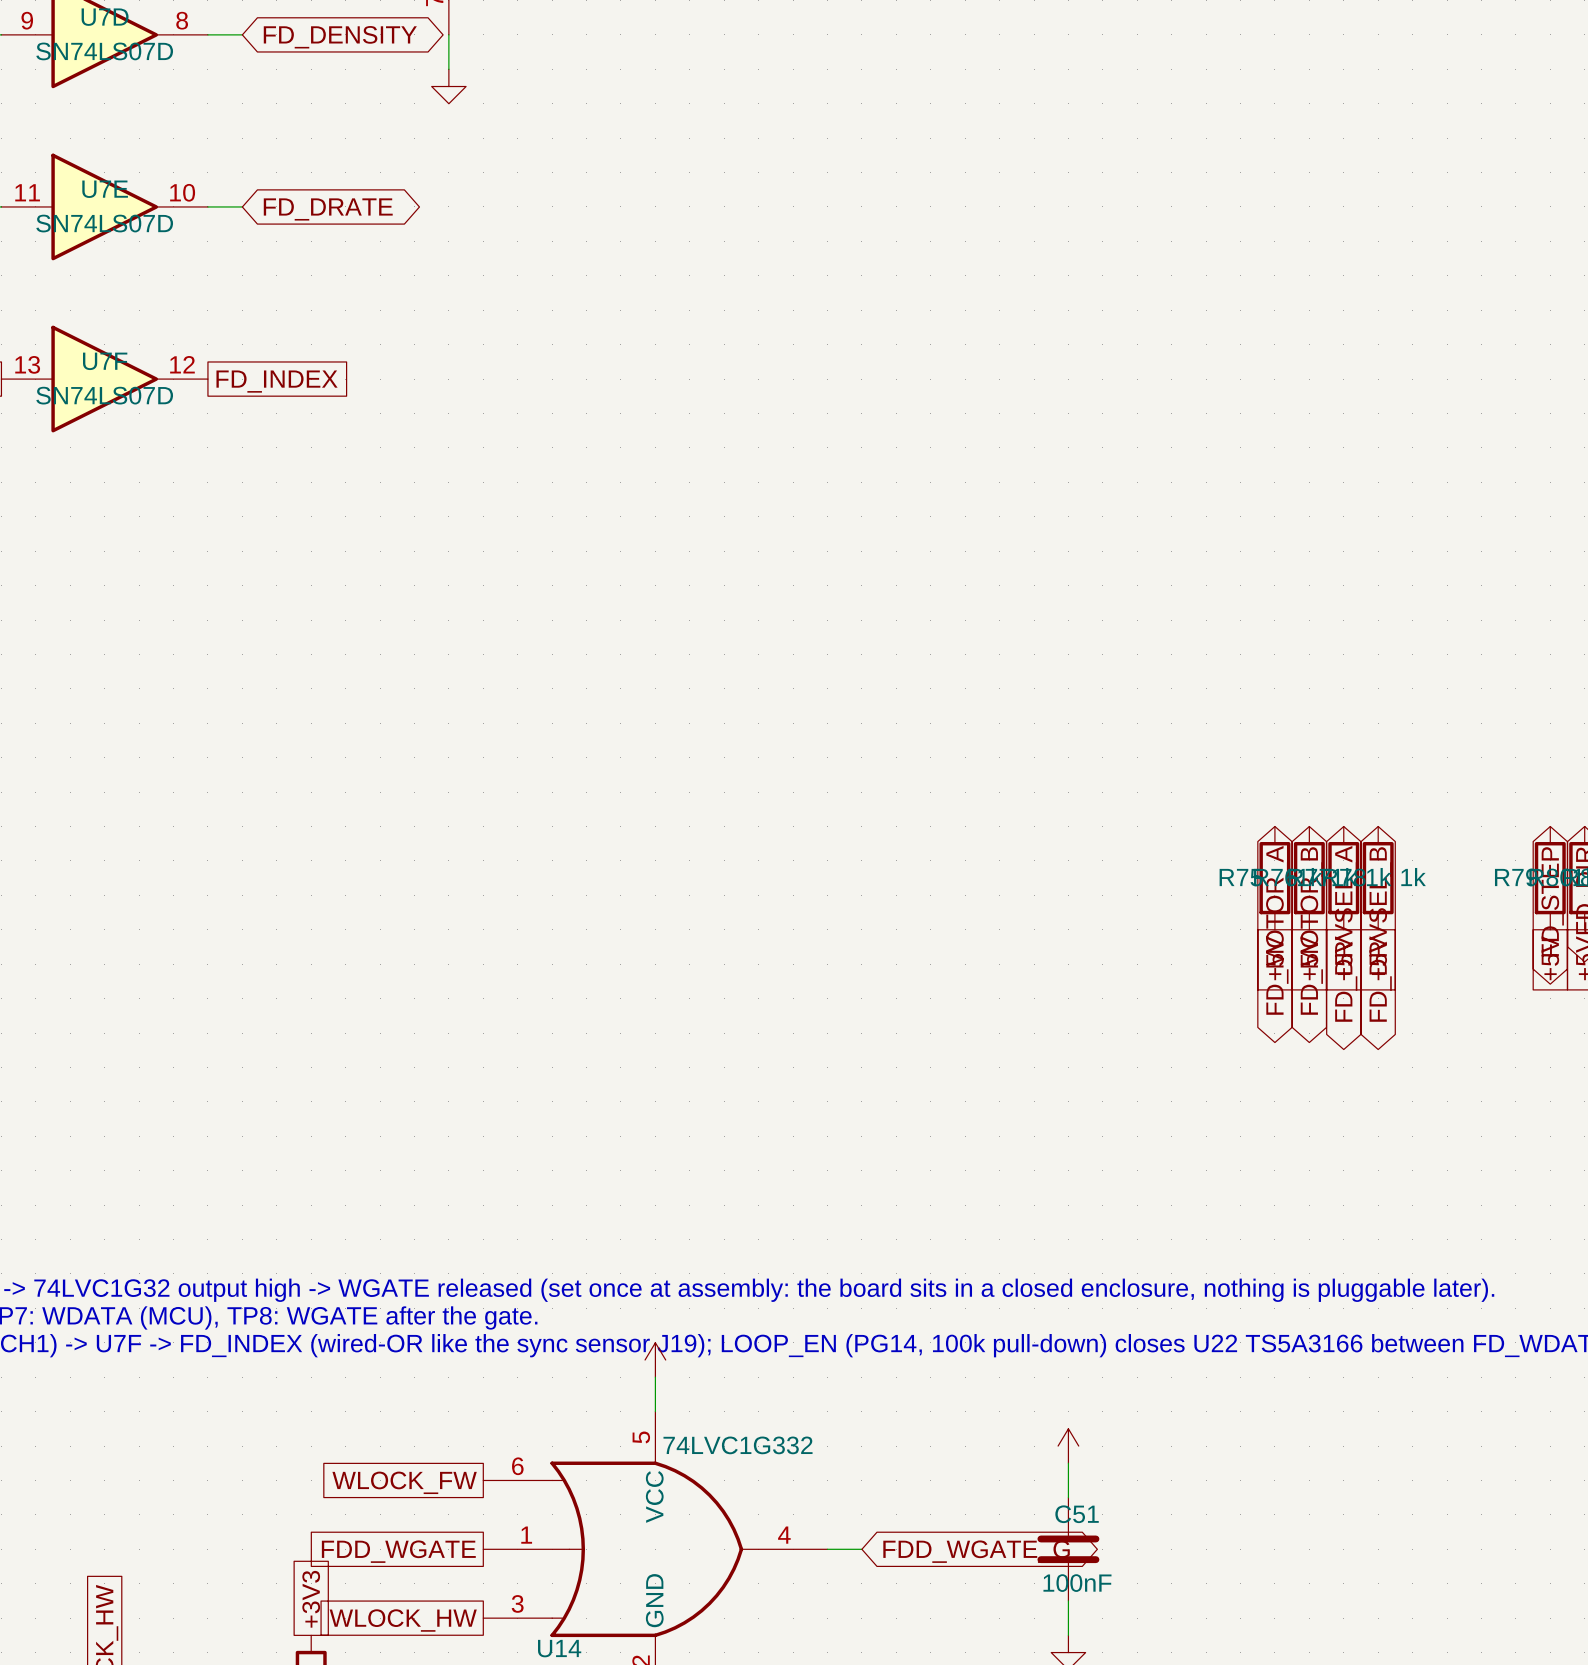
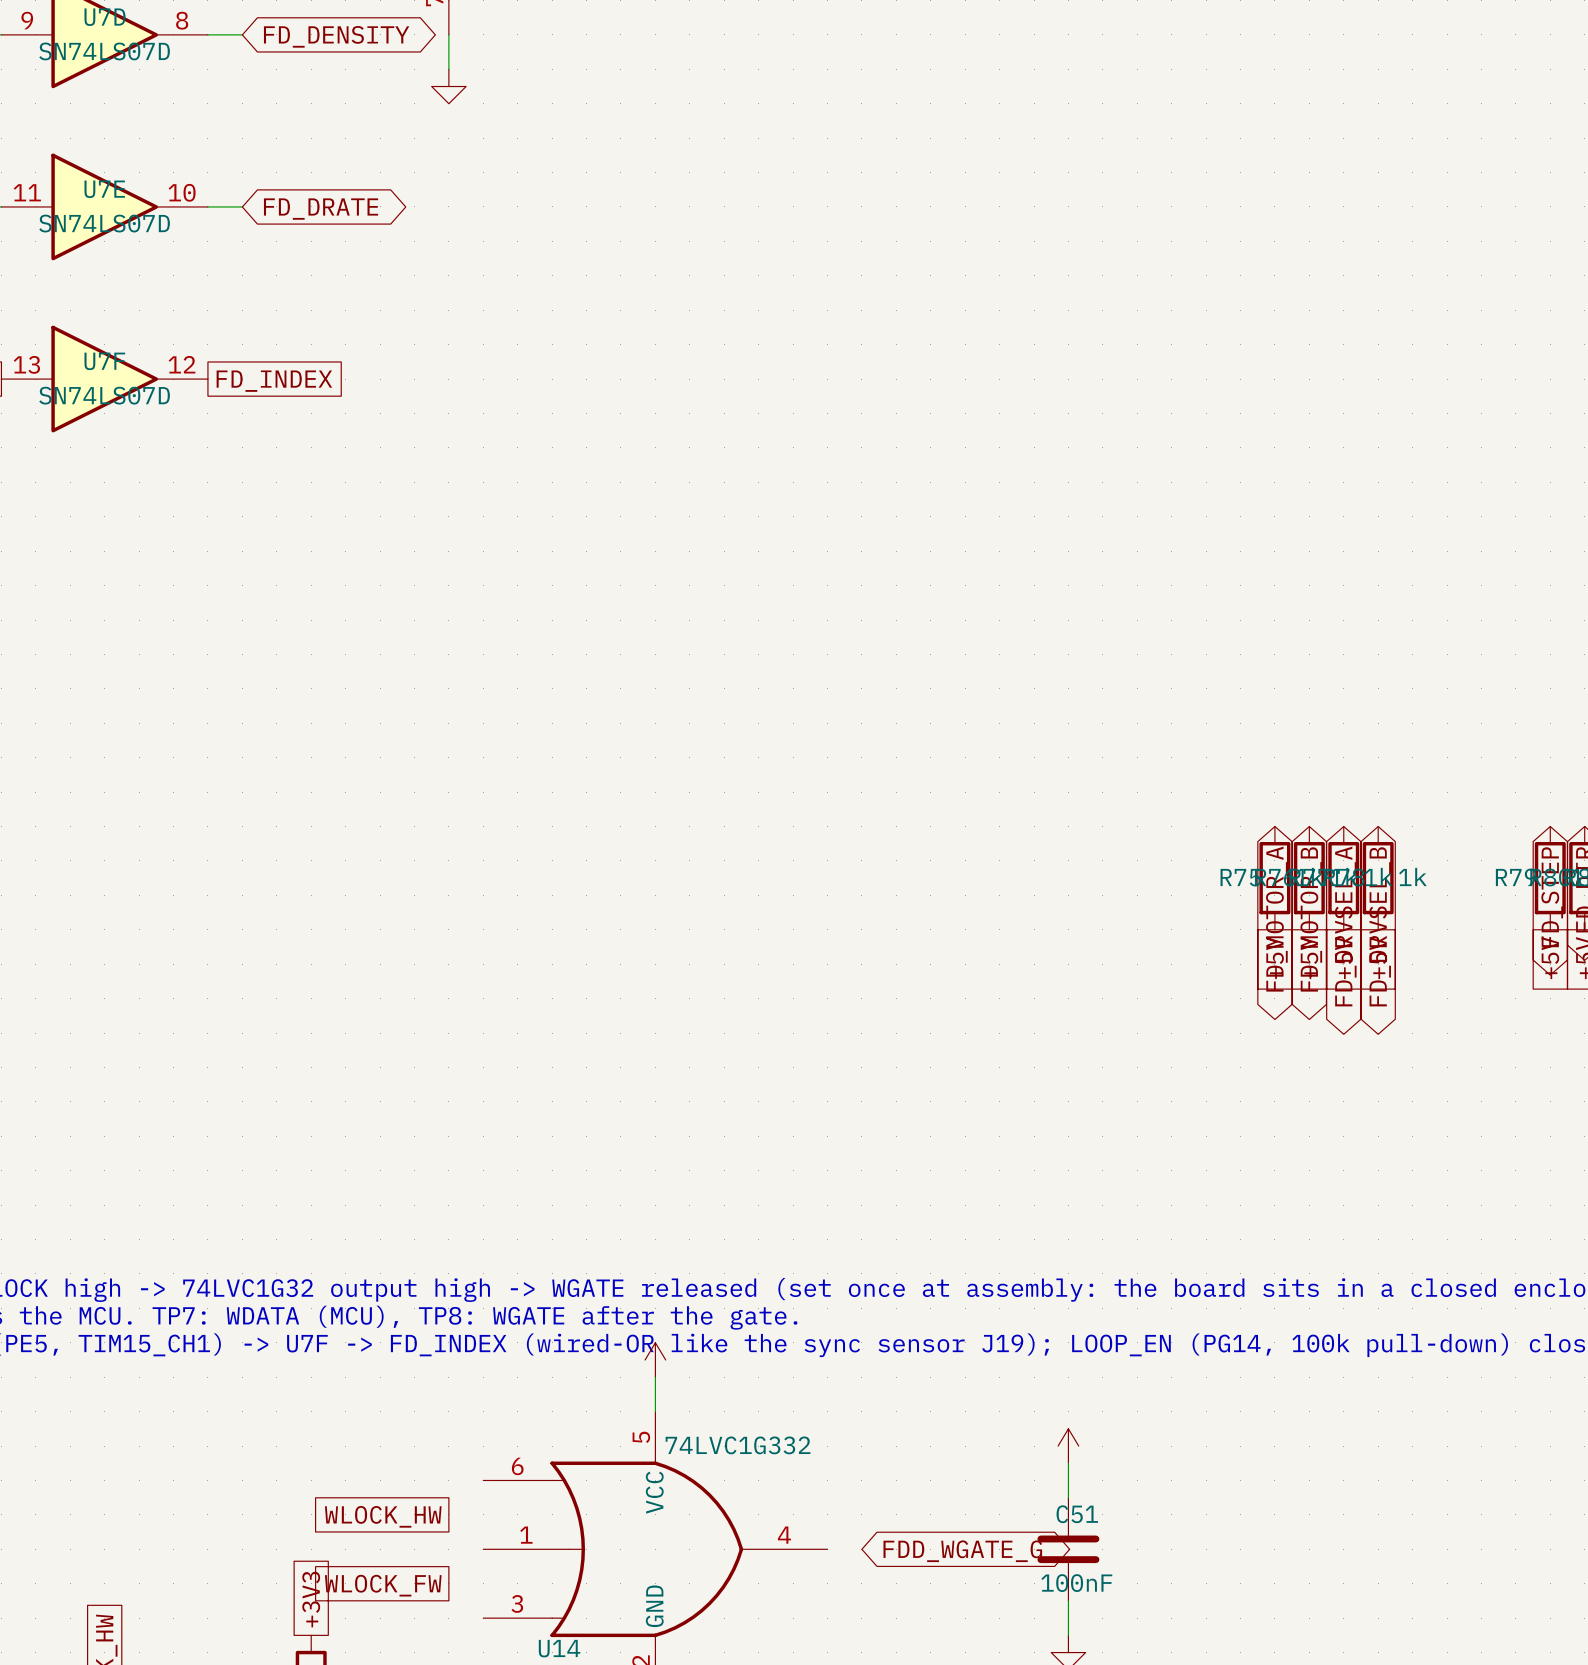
global label position: WLOCK_FW (404, 1482) -> WLOCK_FW (383, 1585)
wire: (827, 1549) (861, 1549) -> none
global label: FDD_WGATE (398, 1551) -> none
global label position: WLOCK_HW (403, 1620) -> WLOCK_HW (383, 1516)

